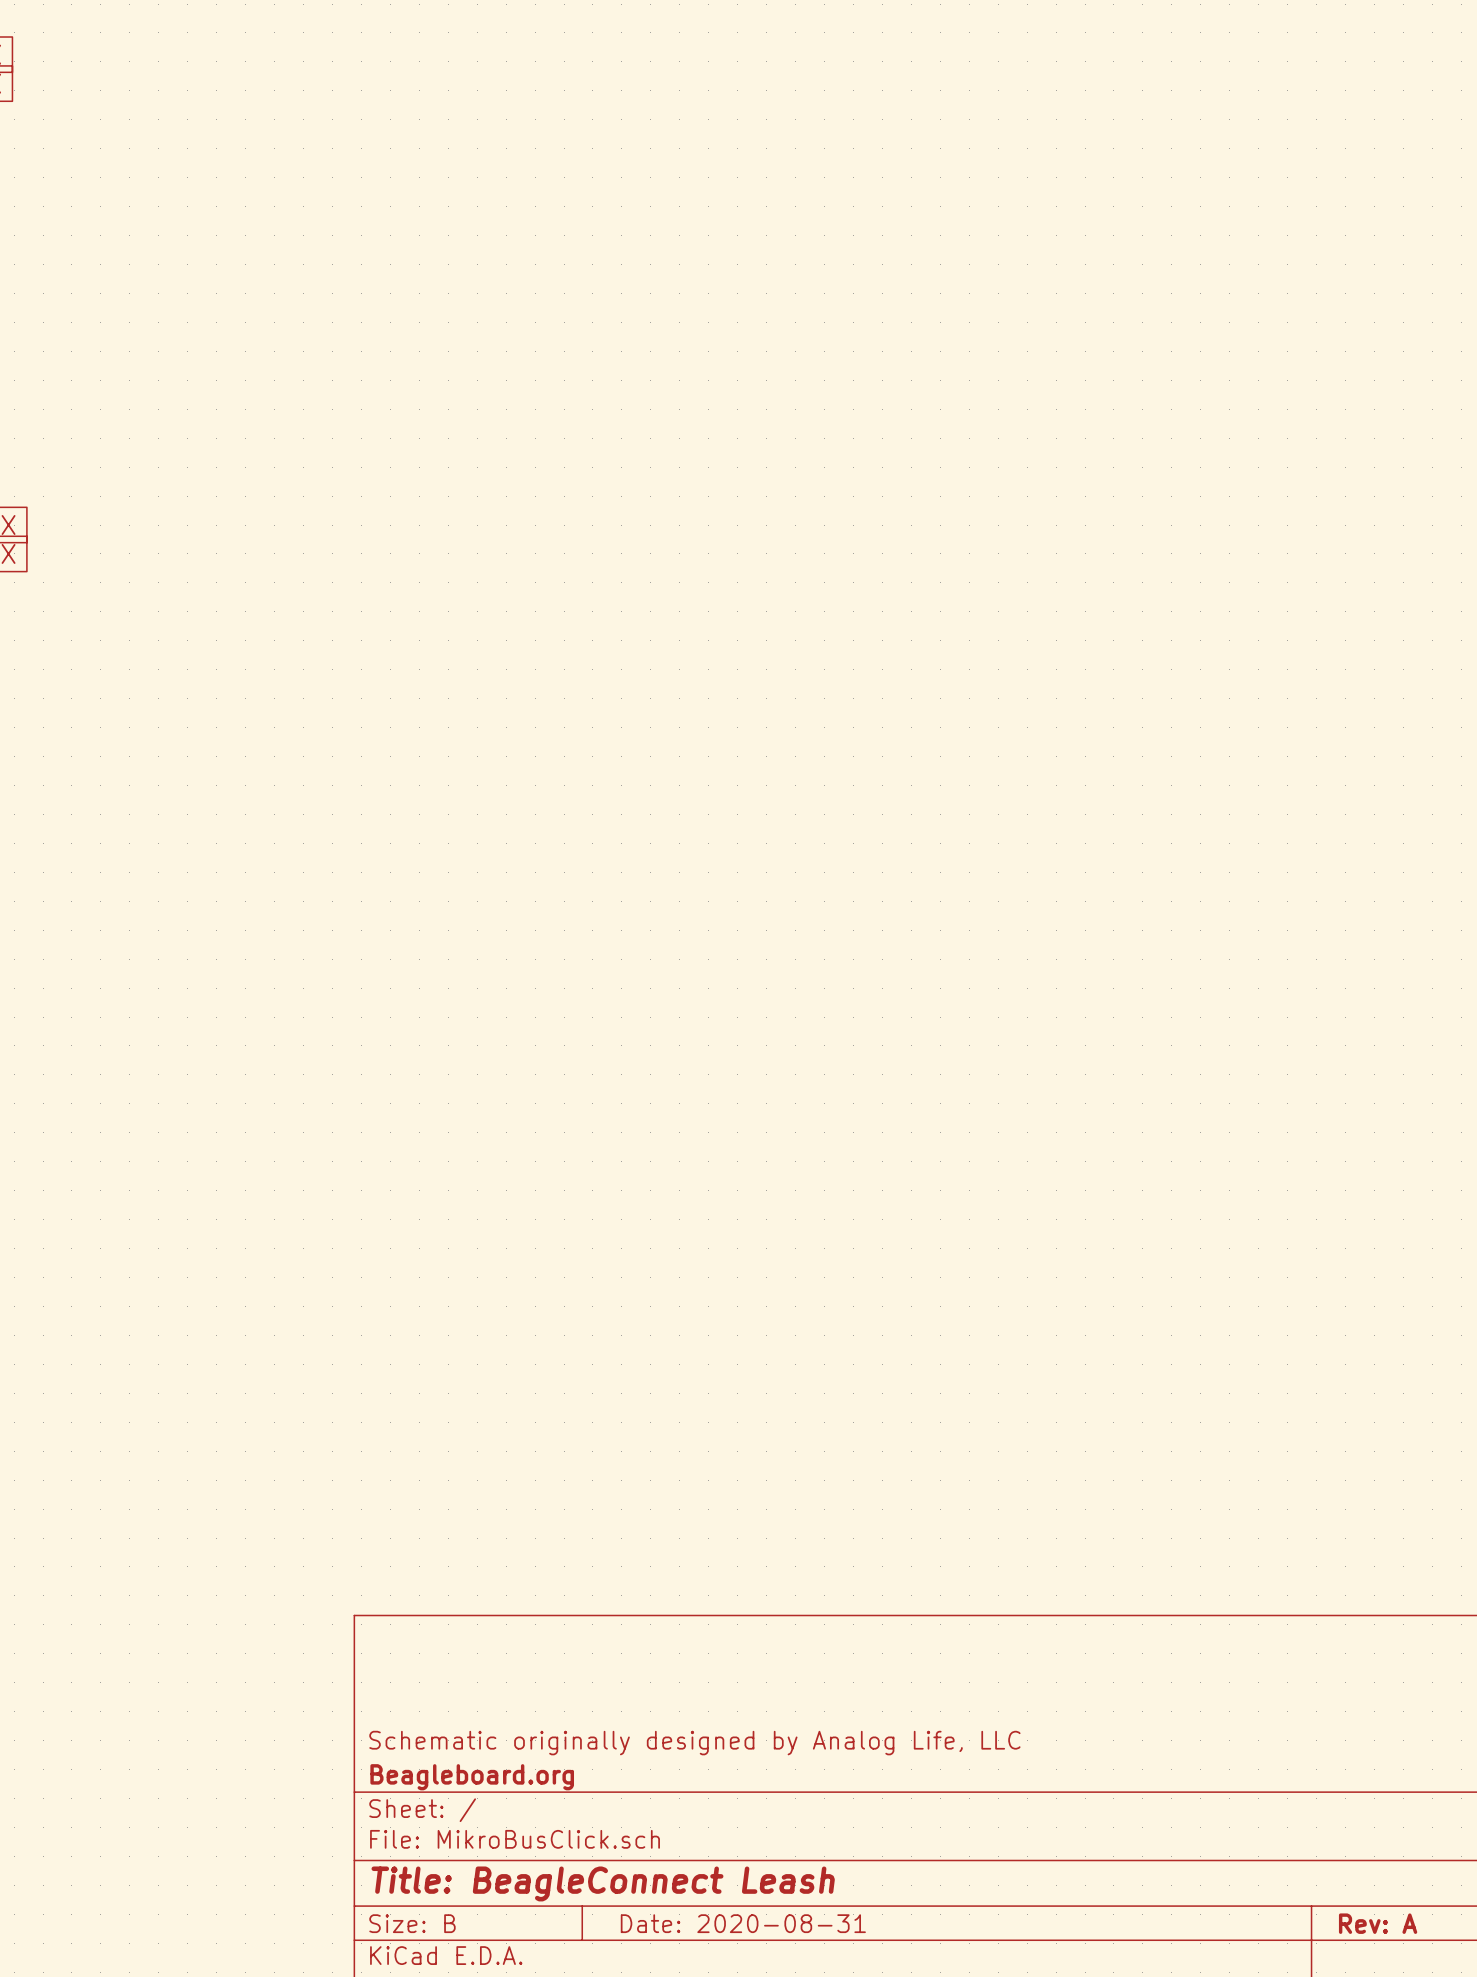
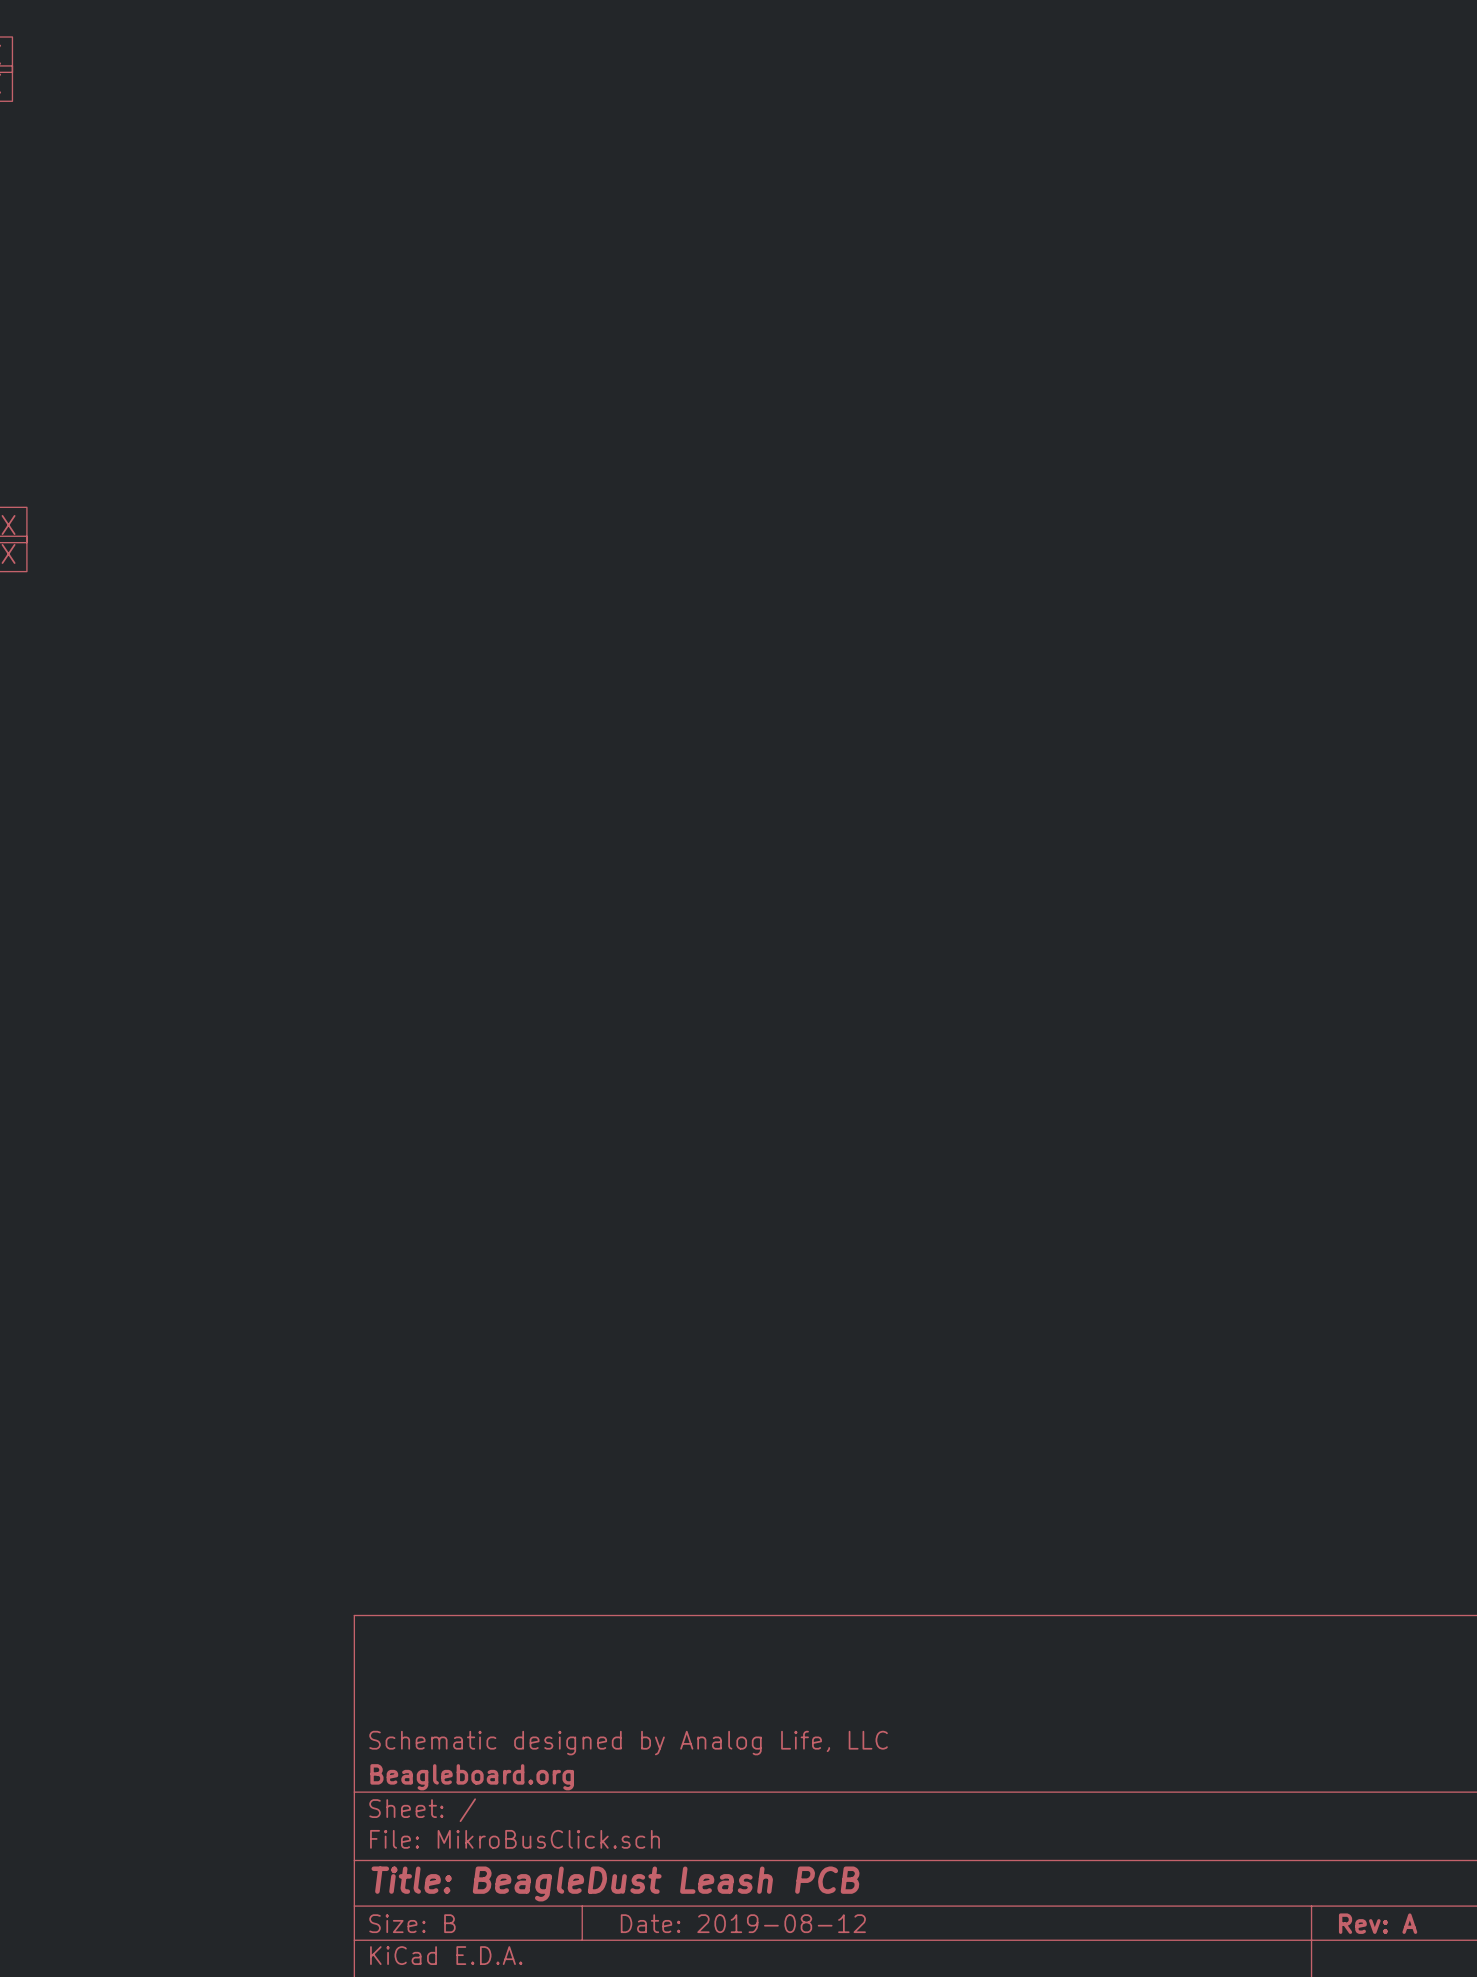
title block: Schematic originally designed by Analog Life, LLC (694, 1743) -> Schematic designed by Analog Life, LLC (628, 1743)
title block: Title: BeagleConnect Leash (603, 1883) -> Title: BeagleDust Leash PCB (615, 1883)
title block: Date: 2020-08-31 (743, 1923) -> Date: 2019-08-12 (743, 1923)

